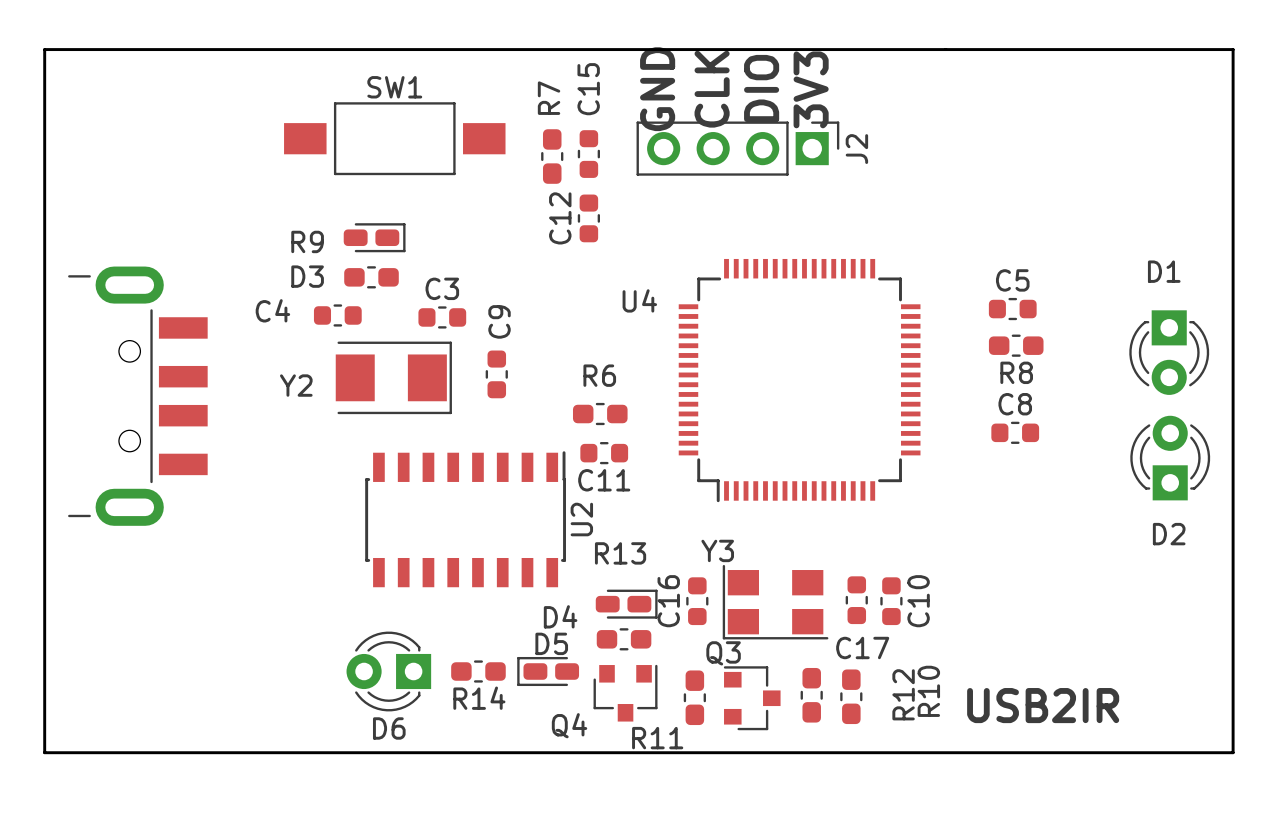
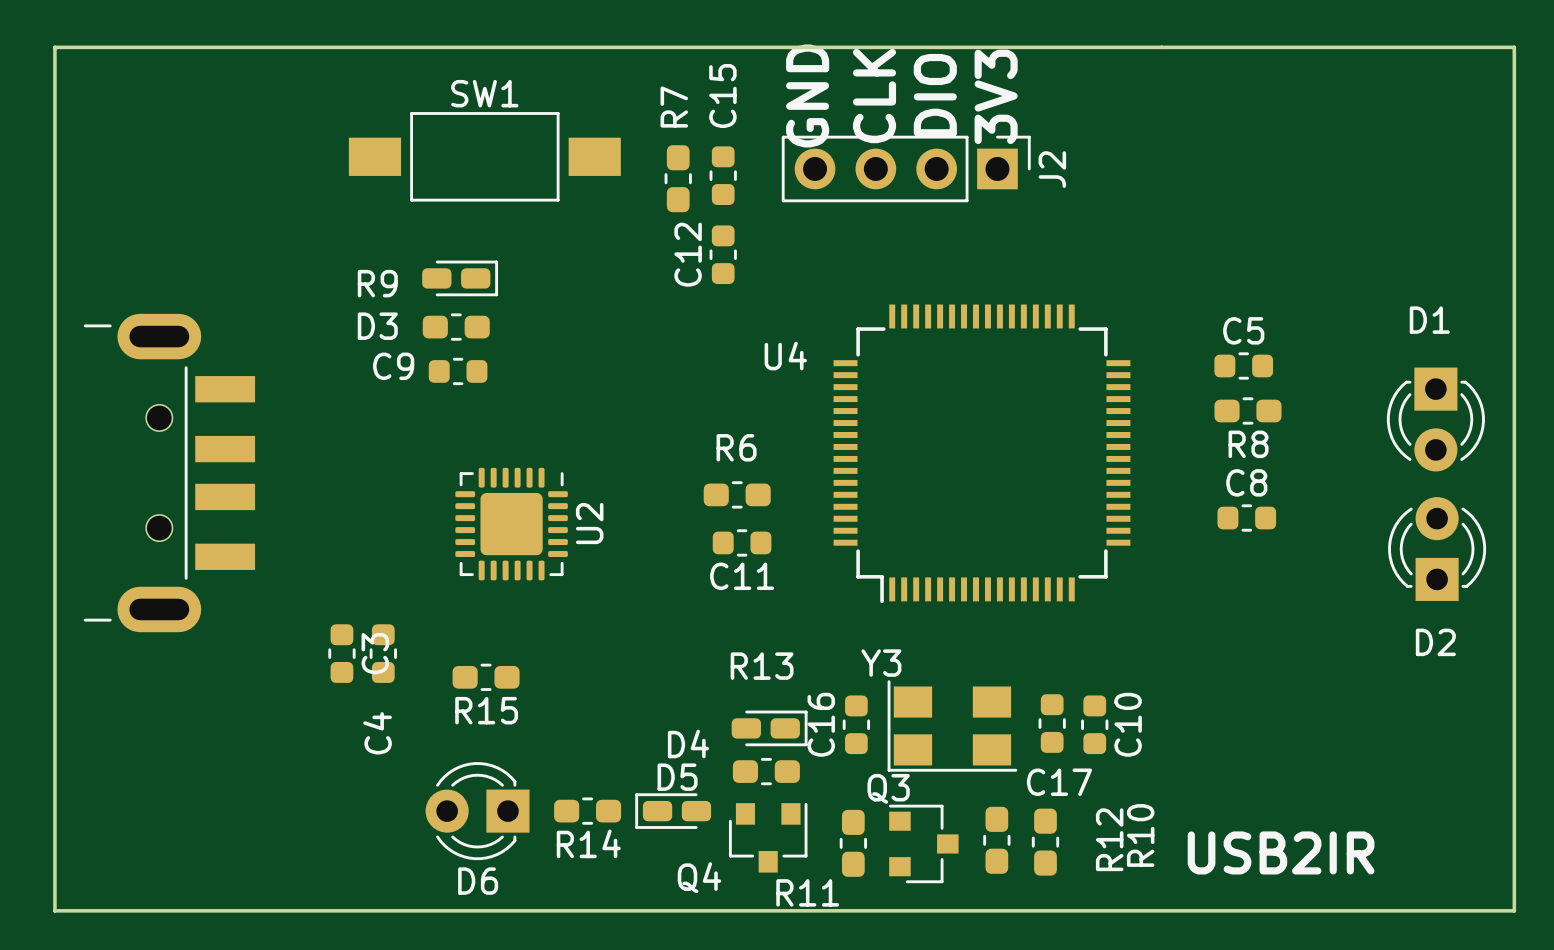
C4 name position: C4 (272, 310) -> C4 (377, 733)
C4 rotation: 0° (337, 315) -> 90° clockwise (383, 653)
C4 position: (337, 315) -> (383, 653)
C3 rotation: 0° (442, 317) -> 90° clockwise (341, 653)
C3 position: (442, 317) -> (341, 653)
C9 name position: C9 (499, 321) -> C9 (393, 366)
C9 rotation: 0° (496, 374) -> 90° clockwise (458, 371)
C9 position: (496, 374) -> (458, 371)
Y2: (393, 377) -> none
U2 footprint: [365, 451, 566, 588] -> [455, 467, 568, 581]
U2 name position: U2 (581, 519) -> U2 (589, 523)
R15: none -> (486, 677)

